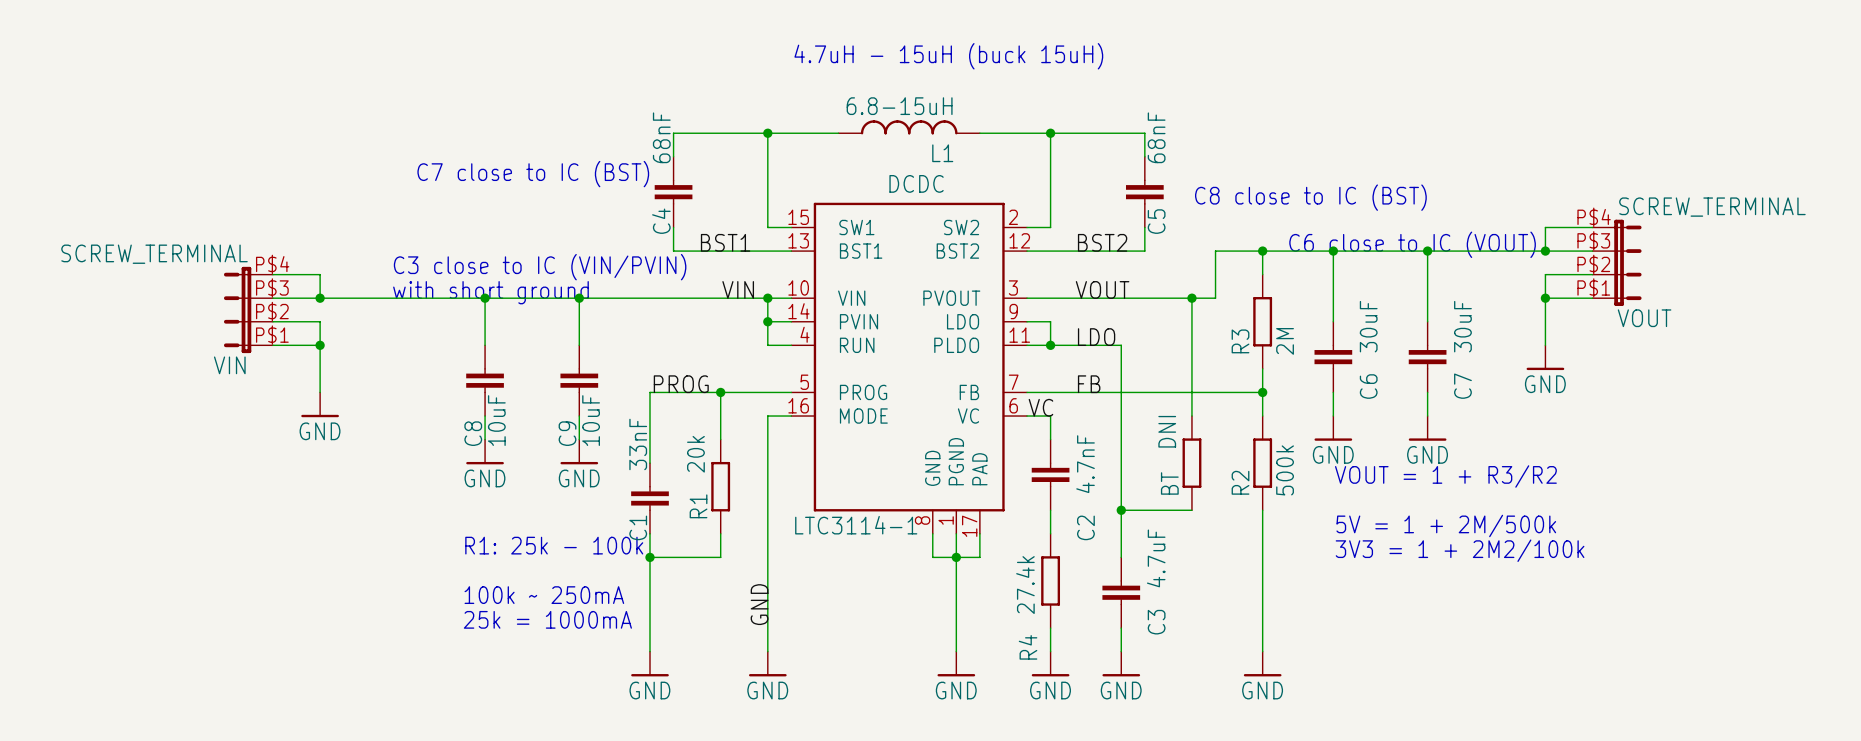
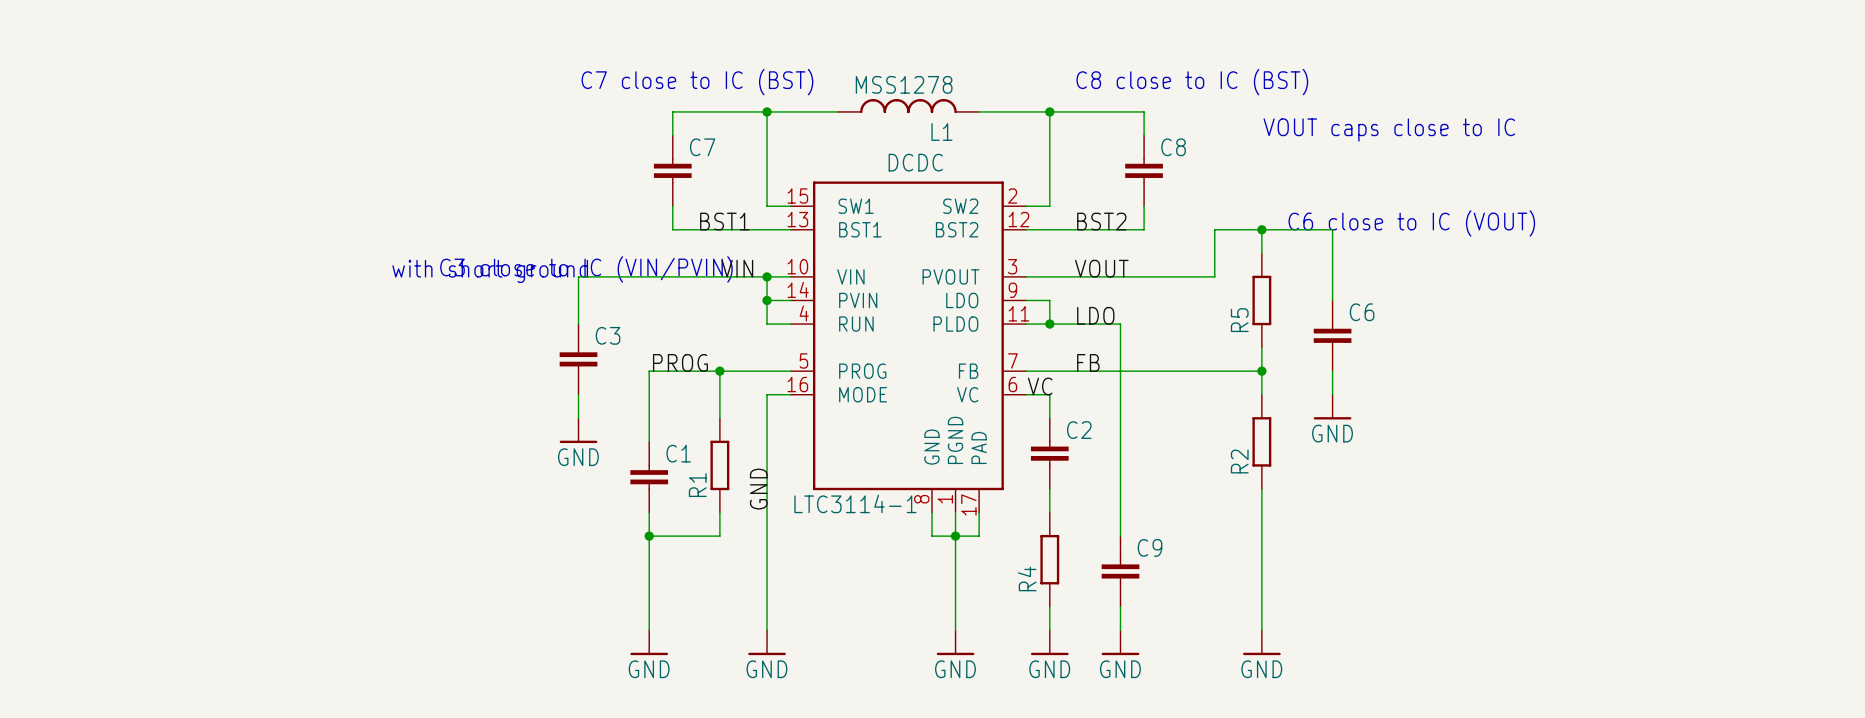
text: 4.7uH - 15uH (buck 15uH) (948, 56) -> none
L1 value: 6.8-15uH (899, 106) -> MSS1278 (904, 84)
C4 value: 68nF (661, 137) -> none
C5 value: 68nF (1156, 137) -> none
text: none -> VOUT caps close to IC (1389, 130)
text position: C7 close to IC (BST) (533, 174) -> C7 close to IC (BST) (697, 82)
text position: C8 close to IC (BST) (1310, 197) -> C8 close to IC (BST) (1192, 82)
C4 name: C4 (661, 221) -> C7 (702, 147)
C5 name: C5 (1156, 221) -> C8 (1173, 147)
wire: (1592, 227) (1545, 227) (1545, 251) -> none
wire: (1333, 251) (1592, 251) -> none
junction: (1333, 251) -> none
wire: (1427, 251) (1427, 321) -> none
junction: (1427, 251) -> none
junction: (1545, 251) -> none
VOUT: SCREW_TERMINAL (1617, 262) -> none
text position: C3 close to IC (VIN/PVIN) (540, 267) -> C3 close to IC (VIN/PVIN) (586, 269)
wire: (272, 274) (320, 274) (320, 298) -> none
wire: (1592, 274) (1545, 274) (1545, 345) -> none
wire: (272, 298) (579, 298) -> none
junction: (320, 298) -> none
wire: (485, 298) (485, 345) -> none
junction: (485, 298) -> none
junction: (579, 298) -> none
wire: (1191, 298) (1191, 416) -> none
junction: (1191, 298) -> none
wire: (1545, 298) (1592, 298) -> none
junction: (1545, 298) -> none
VIN: SCREW_TERMINAL (248, 309) -> none
wire: (272, 321) (320, 321) (320, 392) -> none
C6 value: 30uF (1368, 326) -> none
R3 name: R3 (1240, 341) -> R5 (1239, 320)
R3 value: 2M (1285, 341) -> none
wire: (272, 345) (320, 345) -> none
junction: (320, 345) -> none
C7: 30uF (1427, 357) -> none
power symbol: GND (1545, 357) -> none
C8: 10uF (485, 380) -> none
C6 name rotation: 0° (1368, 386) -> 90° clockwise (1362, 312)
C6 name position: C6 (1368, 386) -> C6 (1362, 312)
wire: (1427, 392) (1427, 416) -> none
power symbol: GND (320, 404) -> none
wire: (485, 416) (485, 439) -> none
C9 value: 10uF (591, 420) -> none
power symbol: GND (1427, 428) -> none
C9 name: C9 (567, 433) -> C3 (608, 335)
C1 value: 33nF (638, 444) -> none
power symbol: GND (485, 451) -> none
R1 value: 20k (695, 454) -> none
BT: DNI (1191, 463) -> none
C2 value: 4.7nF (1085, 464) -> none
R2 value: 500k (1285, 470) -> none
text: VOUT = 1 + R3/R2 (1445, 476) -> none
wire: (1121, 510) (1191, 510) -> none
junction: (1121, 510) -> none
text: 5V = 1 + 2M/500k (1446, 525) -> none
C1 name rotation: 0° (638, 527) -> 90° clockwise (678, 453)
C1 name position: C1 (638, 527) -> C1 (678, 453)
C2 name rotation: 0° (1085, 527) -> 90° clockwise (1079, 430)
C2 name position: C2 (1085, 527) -> C2 (1079, 430)
text: R1: 25k - 100k (554, 545) -> none
text: 3V3 = 1 + 2M2/100k (1460, 550) -> none
C3 value: 4.7uF (1156, 558) -> none
R4 value: 27.4k (1025, 585) -> none
text: 100k ~ 250mA (544, 595) -> none
label position: GND (759, 604) -> GND (758, 489)
text: 25k = 1000mA (547, 619) -> none
C3 name: C3 (1156, 622) -> C9 (1149, 547)
R4 name position: R4 (1028, 647) -> R4 (1027, 578)

